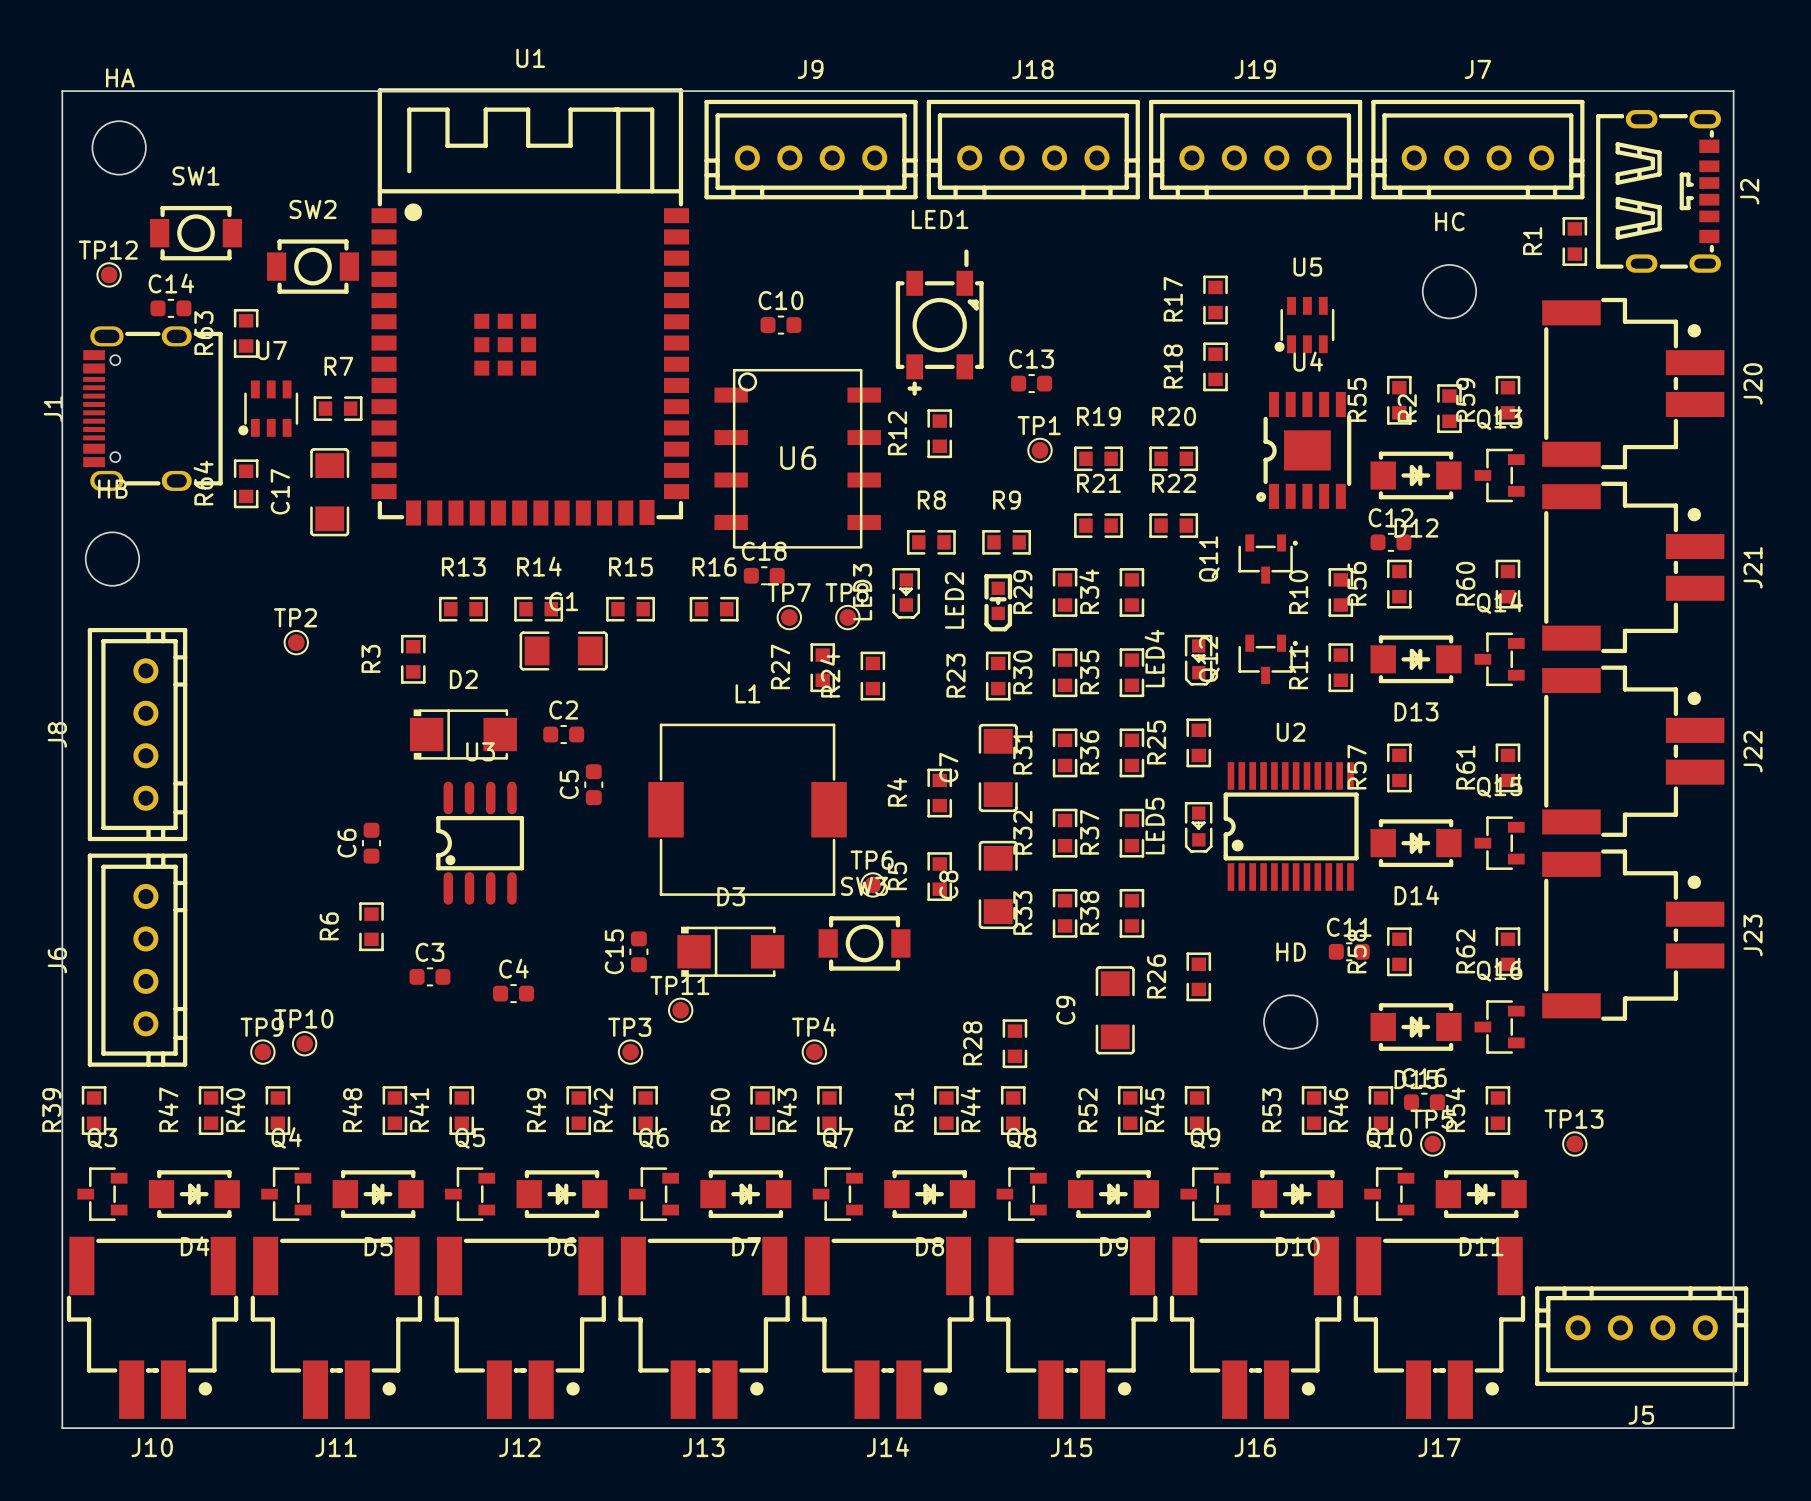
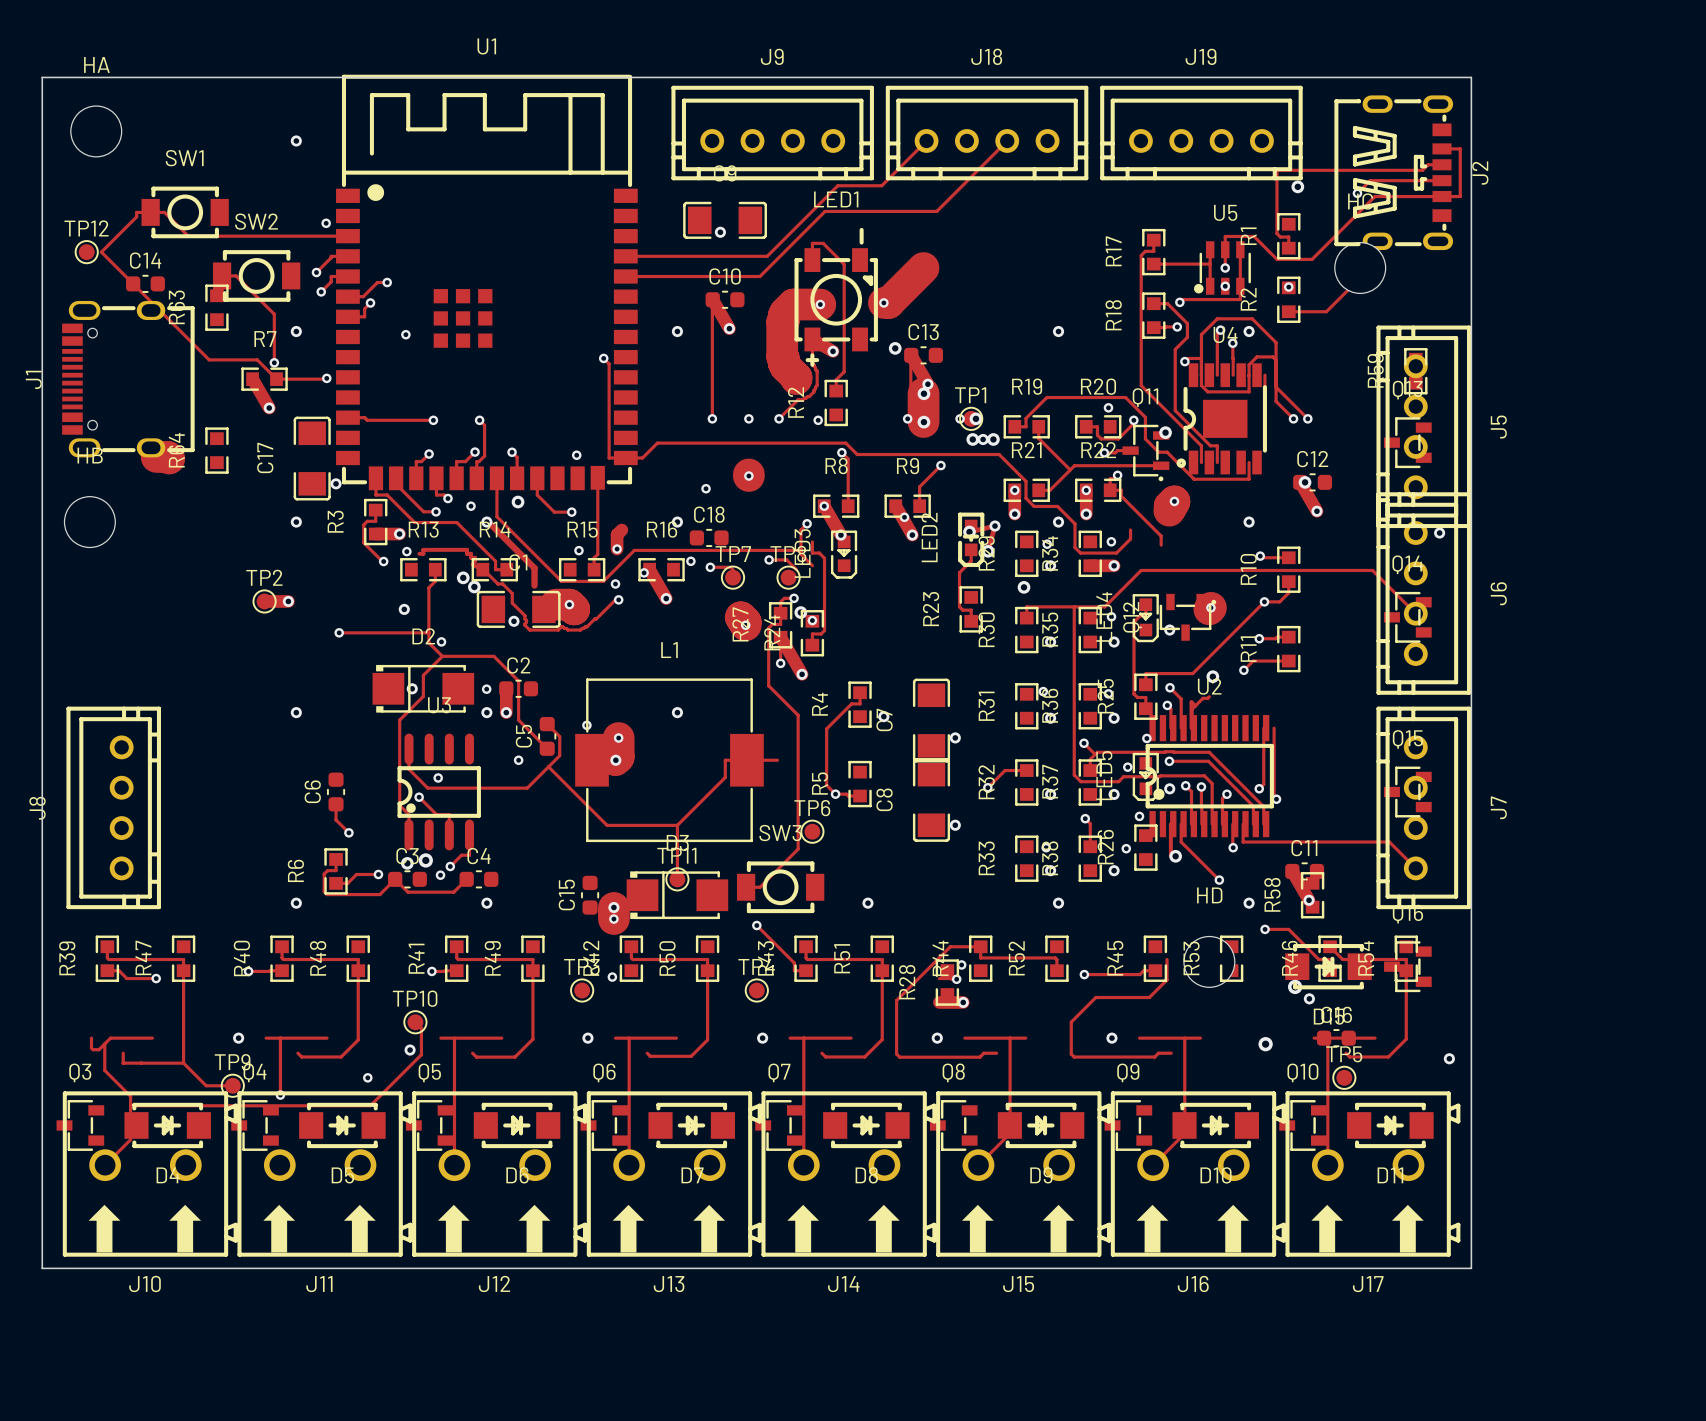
board edge: (1566, 91) (1733, 91) (1733, 1428) (62, 1428) (62, 1344) -> (1471, 77) (1471, 1268) (42, 1268)
J9 position: (811, 149) -> (772, 133)
J18 position: (1033, 149) -> (987, 133)
J19 position: (1255, 149) -> (1201, 133)
J7 rotation: 0° (1477, 149) -> 90° clockwise (1423, 807)
J7 position: (1477, 149) -> (1423, 807)
via: none -> (296, 140)
track: none -> (926, 140) (881, 185) (837, 185) (767, 256) (625, 256)
track: none -> (1007, 140) (936, 211) (825, 211) (759, 276) (625, 276)
track: none -> (1442, 148) (1460, 148) (1460, 196) (1374, 196) (1312, 259) (1277, 259) (1254, 236) (1225, 236) (1225, 268)
track: none -> (1442, 164) (1428, 164) (1422, 170) (1276, 170) (1276, 233) (1280, 237) (1288, 237) (1288, 248)
J2 position: (1658, 191) -> (1393, 172)
track: none -> (1442, 180) (1370, 180) (1357, 193)
via: none -> (1297, 186)
via: none -> (1357, 193)
SW1 position: (196, 233) -> (185, 212)
R1 position: (1574, 241) -> (1288, 236)
via: none -> (326, 223)
via: none -> (720, 232)
track: none -> (347, 236) (188, 236) (164, 212) (136, 212) (136, 216) (101, 252) (209, 359) (257, 359) (276, 379) (326, 378)
track: none -> (1153, 240) (1153, 251) (1145, 251) (1141, 255) (1141, 385) (1201, 445) (1201, 462)
SW2 position: (313, 266) -> (256, 275)
track: none -> (1210, 249) (1210, 286)
track: none -> (1240, 249) (1240, 299) (1182, 299) (1179, 302)
track: none -> (347, 256) (331, 256) (316, 272)
track: none -> (812, 260) (812, 243) (823, 243) (844, 264) (844, 371) (836, 379) (836, 391)
track: none -> (1153, 264) (1210, 264)
track: none -> (923, 268) (888, 302) (883, 302)
via: none -> (1225, 268)
via: none -> (316, 272)
track: none -> (222, 275) (236, 275) (274, 314) (274, 362)
track: none -> (347, 276) (331, 276) (331, 281) (321, 291)
R17 position: (1215, 300) -> (1153, 252)
track: none -> (387, 282) (377, 282) (363, 296) (347, 296)
via: none -> (387, 282)
track: none -> (1355, 282) (1326, 311) (1288, 311)
via: none -> (1225, 286)
via: none -> (1288, 287)
via: none -> (321, 291)
LED1 position: (939, 322) -> (836, 297)
U5 position: (1304, 325) -> (1222, 268)
via: none -> (1179, 302)
track: none -> (370, 302) (364, 308) (364, 316) (347, 316)
via: none -> (370, 302)
via: none -> (883, 302)
track: none -> (1153, 303) (1167, 303) (1187, 323) (1187, 337) (1175, 349) (1175, 410) (1210, 445) (1217, 445) (1217, 462)
track: none -> (820, 304) (793, 304) (783, 315) (782, 356) (785, 366) (796, 379)
via: none -> (820, 304)
track: none -> (1177, 326) (1153, 327)
via: none -> (1177, 326)
track: none -> (729, 328) (712, 299) (712, 418)
via: none -> (729, 328)
track: none -> (1220, 330) (1217, 333) (1217, 375)
via: none -> (1220, 330)
via: none -> (296, 331)
via: none -> (677, 331)
via: none -> (1058, 331)
via: none -> (1249, 331)
via: none -> (405, 334)
R18 position: (1215, 366) -> (1153, 315)
track: none -> (1232, 343) (1233, 375)
via: none -> (1232, 343)
via: none -> (895, 348)
track: none -> (833, 351) (812, 339) (812, 363) (817, 371) (817, 385) (809, 396) (798, 399) (779, 418)
via: none -> (833, 351)
C13 position: (1031, 383) -> (923, 355)
J20: (1633, 383) -> none
track: none -> (603, 358) (609, 363) (609, 457) (642, 457) (657, 443) (845, 443) (857, 454) (999, 454) (1026, 481) (1026, 498) (1034, 506) (1057, 506) (1075, 523) (1075, 547) (1080, 553) (1116, 553) (1130, 539) (1130, 530)
via: none -> (603, 358)
track: none -> (1201, 358) (1187, 358) (1184, 361)
track: none -> (1276, 360) (1272, 356) (1257, 356) (1249, 364) (1249, 391) (1207, 391) (1201, 385) (1201, 334) (1217, 318) (1252, 318) (1276, 342) (1276, 401) (1293, 418)
via: none -> (1184, 361)
via: none -> (274, 362)
R55: (1399, 400) -> none
track: none -> (1264, 375) (1264, 391)
via: none -> (326, 378)
U7: (268, 408) -> none
track: none -> (252, 379) (269, 408)
R7 position: (338, 408) -> (264, 379)
R2 position: (1449, 408) -> (1288, 299)
track: none -> (927, 384) (910, 355) (910, 415) (907, 418)
via: none -> (927, 384)
track: none -> (1276, 387) (1307, 418)
track: none -> (923, 393) (923, 422)
via: none -> (923, 393)
R12 position: (939, 433) -> (836, 402)
via: none -> (1108, 407)
via: none -> (269, 408)
track: none -> (347, 417) (364, 417) (367, 420) (433, 420)
via: none -> (712, 418)
via: none -> (748, 418)
via: none -> (779, 418)
via: none -> (907, 418)
via: none -> (960, 418)
via: none -> (975, 418)
via: none -> (1293, 418)
via: none -> (1307, 418)
via: none -> (433, 420)
track: none -> (479, 420) (484, 425) (484, 456) (476, 461) (476, 478)
via: none -> (479, 420)
via: none -> (818, 420)
track: none -> (1133, 420) (1133, 423) (1118, 438) (1101, 438) (1097, 435) (1097, 426) (1086, 426)
via: none -> (1133, 420)
via: none -> (923, 422)
U6: (797, 458) -> none
track: none -> (1014, 426) (1026, 426) (1026, 418) (1046, 397) (1125, 397) (1145, 417) (1145, 438) (1158, 452) (1167, 452) (1194, 479) (1249, 479) (1249, 462)
track: none -> (1038, 426) (1038, 438) (1070, 469)
via: none -> (1165, 432)
via: none -> (972, 439)
via: none -> (983, 439)
via: none -> (993, 439)
D12: (1416, 475) -> none
track: none -> (1130, 450) (1104, 452)
track: none -> (475, 452) (465, 461) (456, 461) (456, 478)
via: none -> (475, 452)
track: none -> (512, 452) (517, 457) (517, 478)
via: none -> (512, 452)
track: none -> (841, 452) (848, 458) (848, 506)
via: none -> (841, 452)
via: none -> (1104, 452)
track: none -> (429, 454) (421, 461) (416, 461) (416, 478)
via: none -> (429, 454)
via: none -> (576, 455)
track: none -> (156, 456) (169, 458)
C17 position: (329, 492) -> (312, 458)
track: none -> (940, 465) (919, 486) (919, 506)
via: none -> (940, 465)
track: none -> (1161, 465) (1074, 465) (1049, 490) (1038, 490)
track: none -> (748, 474) (748, 476)
track: none -> (1117, 475) (1114, 478) (1110, 478) (1110, 490) (1121, 490) (1121, 496) (1161, 536) (1161, 545)
via: none -> (1117, 475)
via: none -> (748, 476)
track: none -> (597, 477) (597, 554) (594, 558) (594, 569)
track: none -> (375, 478) (375, 495) (387, 495) (414, 522) (456, 522) (495, 561) (495, 569) (506, 569)
track: none -> (396, 478) (396, 484) (423, 511) (436, 511)
track: none -> (436, 478) (436, 495) (444, 495) (447, 498)
track: none -> (496, 478) (496, 516) (561, 581) (603, 581) (634, 550) (801, 550)
track: none -> (537, 478) (537, 495) (554, 512) (571, 512)
track: none -> (1305, 482) (1300, 482) (1316, 511)
via: none -> (1305, 482)
via: none -> (336, 483)
via: none -> (706, 488)
track: none -> (1014, 490) (1014, 514)
via: none -> (1014, 490)
track: none -> (1086, 490) (1086, 514)
via: none -> (1086, 490)
via: none -> (447, 498)
via: none -> (518, 502)
via: none -> (1174, 501)
via: none -> (471, 506)
track: none -> (824, 506) (840, 535)
via: none -> (824, 506)
R8 position: (931, 542) -> (836, 506)
R9 position: (1006, 542) -> (907, 506)
C12 position: (1390, 542) -> (1312, 482)
track: none -> (1171, 507) (1169, 506) (1174, 501) (1169, 510)
track: none -> (375, 510) (375, 521) (367, 521) (363, 524) (363, 542) (383, 561)
via: none -> (1316, 511)
via: none -> (436, 511)
via: none -> (571, 512)
via: none -> (1014, 514)
via: none -> (1086, 514)
track: none -> (904, 517) (894, 507) (894, 506) (895, 506) (912, 535)
via: none -> (904, 517)
via: none -> (296, 522)
track: none -> (486, 522) (534, 568) (534, 585)
via: none -> (486, 522)
via: none -> (677, 522)
via: none -> (1058, 522)
Q11 rotation: 0° (1268, 559) -> 90° clockwise (1145, 452)
Q11 position: (1268, 559) -> (1145, 452)
via: none -> (1249, 522)
track: none -> (807, 523) (801, 529) (801, 554) (812, 565)
via: none -> (807, 523)
via: none -> (995, 526)
track: none -> (621, 530) (617, 534) (617, 549)
J21: (1633, 567) -> none
track: none -> (969, 532) (995, 526) (988, 551)
via: none -> (969, 532)
via: none -> (1439, 533)
track: none -> (375, 534) (399, 534)
via: none -> (399, 534)
via: none -> (840, 535)
via: none -> (912, 535)
track: none -> (812, 541) (812, 553) (819, 553) (824, 558) (824, 630) (821, 633) (812, 633) (812, 645)
via: none -> (1111, 541)
via: none -> (1047, 544)
R56: (1399, 584) -> none
R60: (1507, 584) -> none
via: none -> (617, 549)
track: none -> (971, 549) (971, 561) (959, 572) (959, 606) (962, 610) (971, 610) (971, 621)
via: none -> (578, 550)
via: none -> (988, 551)
via: none -> (406, 551)
track: none -> (419, 553) (423, 553) (423, 549) (467, 549) (467, 553) (471, 553) (471, 557) (474, 557) (472, 564) (482, 569)
R29 position: (1065, 592) -> (1026, 553)
R34 position: (1131, 592) -> (1090, 553)
R10 position: (1340, 592) -> (1288, 569)
track: none -> (1260, 556) (1261, 557) (1288, 557)
via: none -> (1260, 556)
track: none -> (769, 559) (786, 559) (796, 569)
via: none -> (769, 559)
via: none -> (383, 561)
via: none -> (690, 561)
LED2 position: (998, 602) -> (971, 539)
via: none -> (1050, 565)
track: none -> (1090, 565) (1114, 565)
via: none -> (1114, 565)
track: none -> (710, 567) (730, 567) (733, 569)
via: none -> (710, 567)
track: none -> (435, 569) (435, 581) (428, 587) (428, 642) (442, 656)
track: none -> (482, 569) (497, 583) (502, 583) (512, 593) (512, 603) (524, 615) (526, 620) (524, 625) (529, 630) (558, 630) (561, 626) (567, 630) (580, 630) (596, 618) (615, 599) (618, 599)
track: none -> (649, 569) (666, 598)
via: none -> (644, 572)
via: none -> (463, 577)
track: none -> (1288, 581) (1288, 592) (1279, 601) (1264, 601) (1192, 673) (1145, 673) (1145, 684)
via: none -> (615, 583)
via: none -> (474, 586)
via: none -> (1024, 587)
via: none -> (666, 598)
track: none -> (794, 598) (784, 598) (780, 602) (780, 624) (772, 624) (768, 628) (768, 685) (798, 715) (798, 849) (760, 887) (746, 887)
via: none -> (794, 598)
via: none -> (618, 599)
track: none -> (264, 601) (288, 601)
via: none -> (288, 601)
via: none -> (1264, 601)
track: none -> (555, 604) (569, 604) (574, 609)
via: none -> (569, 604)
track: none -> (1145, 604) (1145, 615) (1140, 615) (1133, 622) (1133, 694) (1137, 697) (1145, 697) (1145, 708)
track: none -> (1074, 606) (1074, 775) (1080, 781) (1118, 781) (1123, 776) (1204, 775) (1212, 783) (1212, 824)
track: none -> (1210, 607) (1209, 609)
via: none -> (1210, 607)
via: none -> (404, 609)
via: none -> (800, 612)
track: none -> (1415, 613) (1372, 570) (1141, 570) (1104, 606) (1026, 606) (1026, 618)
via: none -> (1111, 616)
R3 position: (413, 659) -> (375, 522)
D13: (1416, 659) -> none
LED4 position: (1198, 660) -> (1145, 618)
via: none -> (812, 620)
via: none -> (513, 621)
track: none -> (743, 621) (740, 617) (745, 622) (745, 625)
via: none -> (745, 625)
R27 position: (822, 667) -> (780, 625)
R11 position: (1340, 667) -> (1288, 649)
R30 position: (1065, 672) -> (1026, 630)
R35 position: (1131, 672) -> (1090, 630)
via: none -> (1169, 630)
track: none -> (339, 632) (428, 632)
via: none -> (339, 632)
R23 position: (998, 676) -> (971, 609)
track: none -> (1288, 637) (1259, 638)
via: none -> (1259, 638)
via: none -> (441, 641)
via: none -> (1050, 642)
via: none -> (1114, 642)
track: none -> (442, 656) (493, 656) (518, 681) (518, 720) (547, 748)
track: none -> (442, 656) (423, 675) (423, 696) (399, 720) (399, 805) (408, 814) (408, 834)
track: none -> (1288, 661) (1253, 661) (1243, 670)
track: none -> (780, 663) (780, 637) (802, 674)
via: none -> (780, 663)
via: none -> (1243, 670)
via: none -> (802, 674)
via: none -> (1212, 676)
track: none -> (1170, 687) (1181, 698) (1181, 728)
via: none -> (1170, 687)
J8 position: (137, 734) -> (113, 807)
via: none -> (412, 688)
via: none -> (486, 689)
track: none -> (506, 688) (506, 712)
via: none -> (1043, 691)
track: none -> (860, 692) (860, 703) (851, 703) (826, 728) (826, 785) (835, 794) (860, 796)
via: none -> (1108, 693)
R25 position: (1198, 742) -> (1145, 696)
track: none -> (1209, 696) (1203, 698) (1191, 709) (1191, 728)
J22: (1633, 751) -> none
R31 position: (1065, 752) -> (1026, 706)
R36 position: (1131, 752) -> (1090, 706)
track: none -> (1167, 705) (1170, 708) (1170, 728)
via: none -> (1167, 705)
track: none -> (1195, 706) (1191, 702) (1191, 728)
via: none -> (296, 712)
via: none -> (486, 712)
via: none -> (506, 712)
via: none -> (677, 712)
via: none -> (883, 716)
via: none -> (1050, 718)
via: none -> (1114, 718)
R57: (1399, 767) -> none
R61: (1507, 767) -> none
track: none -> (547, 724) (559, 736) (559, 755) (527, 788) (427, 788) (408, 769) (408, 749)
via: none -> (586, 725)
track: none -> (1263, 728) (1263, 784) (1259, 788)
track: none -> (1274, 728) (1274, 796) (1276, 799)
via: none -> (618, 738)
via: none -> (955, 737)
via: none -> (1146, 738)
track: none -> (1084, 743) (1095, 754)
via: none -> (1084, 743)
R4 position: (939, 793) -> (860, 704)
via: none -> (518, 760)
track: none -> (591, 760) (596, 760) (618, 738) (618, 757) (615, 760)
via: none -> (615, 760)
L1 position: (747, 809) -> (669, 760)
track: none -> (777, 760) (725, 760) (725, 777) (677, 825)
track: none -> (1169, 761) (1208, 761) (1253, 806) (1253, 824)
via: none -> (1169, 761)
track: none -> (548, 766) (607, 825) (677, 825)
via: none -> (1127, 767)
track: none -> (1026, 770) (1005, 770) (987, 787)
track: none -> (1090, 770) (1090, 759) (1097, 752) (1209, 752) (1263, 806) (1263, 824)
LED5 position: (1198, 827) -> (1145, 776)
via: none -> (438, 777)
R32 position: (1065, 833) -> (1026, 782)
R37 position: (1131, 833) -> (1090, 782)
track: none -> (1185, 785) (1191, 791) (1191, 824)
via: none -> (1185, 785)
track: none -> (1201, 786) (1201, 824)
via: none -> (1201, 786)
via: none -> (987, 787)
via: none -> (1169, 788)
via: none -> (1259, 788)
D14: (1416, 843) -> none
via: none -> (835, 794)
via: none -> (1050, 794)
via: none -> (1114, 794)
track: none -> (1226, 794) (1222, 798) (1222, 824)
via: none -> (1226, 794)
track: none -> (419, 797) (436, 814) (449, 814) (449, 834)
via: none -> (419, 797)
via: none -> (1276, 799)
track: none -> (336, 804) (336, 819) (348, 832)
via: none -> (1139, 816)
track: none -> (1085, 818) (1090, 823) (1090, 846)
via: none -> (1085, 818)
R5 position: (939, 876) -> (860, 784)
track: none -> (1170, 824) (1170, 856)
track: none -> (1181, 824) (1181, 842) (1219, 880)
track: none -> (1232, 824) (1233, 847)
track: none -> (1243, 824) (1243, 842) (1389, 842) (1415, 868)
track: none -> (677, 825) (677, 879)
via: none -> (955, 825)
C8 position: (998, 884) -> (931, 799)
via: none -> (348, 832)
track: none -> (469, 834) (469, 855) (461, 855) (450, 866)
via: none -> (1046, 847)
via: none -> (1233, 847)
via: none -> (1126, 848)
via: none -> (1175, 856)
R33 position: (1065, 913) -> (1026, 858)
R38 position: (1131, 913) -> (1090, 858)
track: none -> (336, 859) (336, 870) (327, 870) (324, 874) (324, 891) (327, 894) (379, 894) (395, 879) (407, 892) (453, 892) (466, 879)
via: none -> (425, 860)
via: none -> (407, 863)
via: none -> (450, 866)
via: none -> (1050, 870)
via: none -> (1114, 870)
track: none -> (1292, 871) (1309, 900)
track: none -> (378, 874) (356, 874) (347, 883) (336, 883)
via: none -> (378, 874)
via: none -> (440, 875)
via: none -> (1219, 880)
J23: (1633, 935) -> none
SW3 position: (864, 943) -> (780, 887)
C11 position: (1349, 951) -> (1304, 871)
R62: (1507, 951) -> none
via: none -> (1309, 900)
J6 rotation: 0° (137, 960) -> 180° (1423, 593)
J6 position: (137, 960) -> (1423, 593)
via: none -> (296, 903)
via: none -> (486, 903)
via: none -> (867, 903)
via: none -> (1058, 903)
via: none -> (1249, 903)
via: none -> (613, 907)
track: none -> (613, 907) (613, 919)
C3 position: (430, 976) -> (407, 879)
via: none -> (613, 919)
R26 position: (1198, 976) -> (1145, 847)
track: none -> (756, 925) (794, 963) (794, 970) (806, 970)
via: none -> (756, 925)
track: none -> (1265, 929) (1288, 929) (1318, 959) (1330, 959) (1330, 970)
via: none -> (1265, 929)
C4 position: (513, 993) -> (478, 879)
track: none -> (107, 946) (108, 959) (183, 959) (183, 1063)
track: none -> (282, 946) (283, 959) (358, 959) (358, 1039) (341, 1056) (301, 1056) (297, 1053)
track: none -> (456, 946) (458, 959) (532, 959) (532, 1039) (514, 1057) (476, 1057) (472, 1053)
track: none -> (631, 946) (632, 959) (707, 959) (707, 1039) (691, 1056) (650, 1056) (647, 1053)
track: none -> (806, 946) (807, 959) (882, 959) (882, 1039) (864, 1056) (825, 1056) (821, 1053)
track: none -> (1330, 946) (1342, 959) (1406, 959) (1406, 1039) (1388, 1056) (1349, 1056) (1345, 1053)
TP11 position: (680, 1010) -> (677, 879)
C9 rotation: 0° (1115, 1010) -> 90° clockwise (725, 220)
C9 position: (1115, 1010) -> (725, 220)
track: none -> (1167, 959) (1167, 979) (1149, 997) (1095, 997) (1071, 1022) (1071, 1054) (1074, 1057) (1154, 1057) (1158, 1053) (1171, 1053)
via: none -> (961, 964)
track: none -> (107, 970) (119, 970) (126, 978) (156, 978)
track: none -> (282, 970) (248, 971)
track: none -> (456, 970) (431, 971)
track: none -> (1056, 970) (1055, 957) (980, 957) (980, 946) (950, 946) (896, 1000) (896, 1054) (899, 1057) (979, 1057) (983, 1053) (996, 1053)
track: none -> (1155, 970) (1143, 970) (1139, 974) (1084, 974)
via: none -> (248, 971)
via: none -> (431, 971)
via: none -> (1084, 974)
via: none -> (612, 977)
via: none -> (156, 978)
track: none -> (939, 978) (956, 979)
via: none -> (956, 979)
TP10 position: (304, 1043) -> (415, 1022)
via: none -> (1295, 986)
TP9 position: (262, 1052) -> (232, 1085)
via: none -> (1309, 998)
track: none -> (939, 1002) (963, 1002)
via: none -> (963, 1002)
track: none -> (415, 1022) (421, 1028) (421, 1054) (370, 1105) (130, 1105)
track: none -> (91, 1038) (93, 1049) (98, 1049) (110, 1038) (152, 1038)
via: none -> (238, 1038)
track: none -> (266, 1038) (327, 1038)
track: none -> (280, 1038) (280, 1095)
track: none -> (440, 1038) (501, 1038)
track: none -> (454, 1038) (454, 1165)
via: none -> (587, 1038)
track: none -> (615, 1038) (676, 1038)
track: none -> (629, 1038) (629, 1165)
via: none -> (762, 1038)
track: none -> (790, 1038) (851, 1038)
track: none -> (803, 1038) (803, 1165)
via: none -> (937, 1038)
track: none -> (964, 1038) (1025, 1038)
track: none -> (1010, 1038) (1010, 1133) (978, 1165)
via: none -> (1111, 1038)
track: none -> (1139, 1038) (1200, 1038)
track: none -> (1184, 1038) (1184, 1133) (1153, 1165)
track: none -> (1314, 1038) (1375, 1038)
track: none -> (1327, 1038) (1327, 1165)
track: none -> (104, 1043) (104, 1070) (130, 1096) (130, 1139) (105, 1165)
via: none -> (1265, 1044)
R39 position: (94, 1110) -> (107, 958)
R47 position: (211, 1110) -> (183, 958)
R40 position: (277, 1110) -> (282, 958)
R48 position: (394, 1110) -> (358, 958)
R41 position: (461, 1110) -> (456, 958)
R49 position: (578, 1110) -> (532, 958)
R42 position: (645, 1110) -> (631, 958)
R50 position: (762, 1110) -> (707, 958)
R43 position: (829, 1110) -> (806, 958)
R51 position: (946, 1110) -> (882, 958)
R44 position: (1013, 1110) -> (980, 958)
R52 position: (1130, 1110) -> (1056, 958)
R45 position: (1197, 1110) -> (1155, 958)
R53 position: (1314, 1110) -> (1231, 958)
R46 position: (1380, 1110) -> (1330, 958)
R54 position: (1497, 1110) -> (1406, 958)
via: none -> (410, 1050)
track: none -> (123, 1053) (123, 1063) (183, 1063)
via: none -> (1449, 1058)
track: none -> (183, 1063) (206, 1085) (232, 1085)
via: none -> (367, 1077)
TP13: (1574, 1144) -> none
via: none -> (280, 1095)
J10 footprint: [66, 1236, 239, 1419] -> [62, 1091, 238, 1257]
J11 footprint: [250, 1236, 423, 1419] -> [237, 1091, 413, 1257]
J12 footprint: [434, 1236, 606, 1419] -> [412, 1091, 588, 1257]
J13 footprint: [618, 1236, 790, 1419] -> [586, 1091, 762, 1257]
J14 footprint: [802, 1236, 974, 1419] -> [761, 1091, 937, 1257]
J15 footprint: [986, 1236, 1158, 1419] -> [936, 1091, 1112, 1257]
J16 footprint: [1169, 1236, 1342, 1419] -> [1110, 1091, 1286, 1257]
J17 footprint: [1353, 1236, 1526, 1419] -> [1285, 1091, 1461, 1257]
J5 rotation: 0° (1641, 1336) -> 90° counterclockwise (1423, 426)
J5 position: (1641, 1336) -> (1423, 426)

